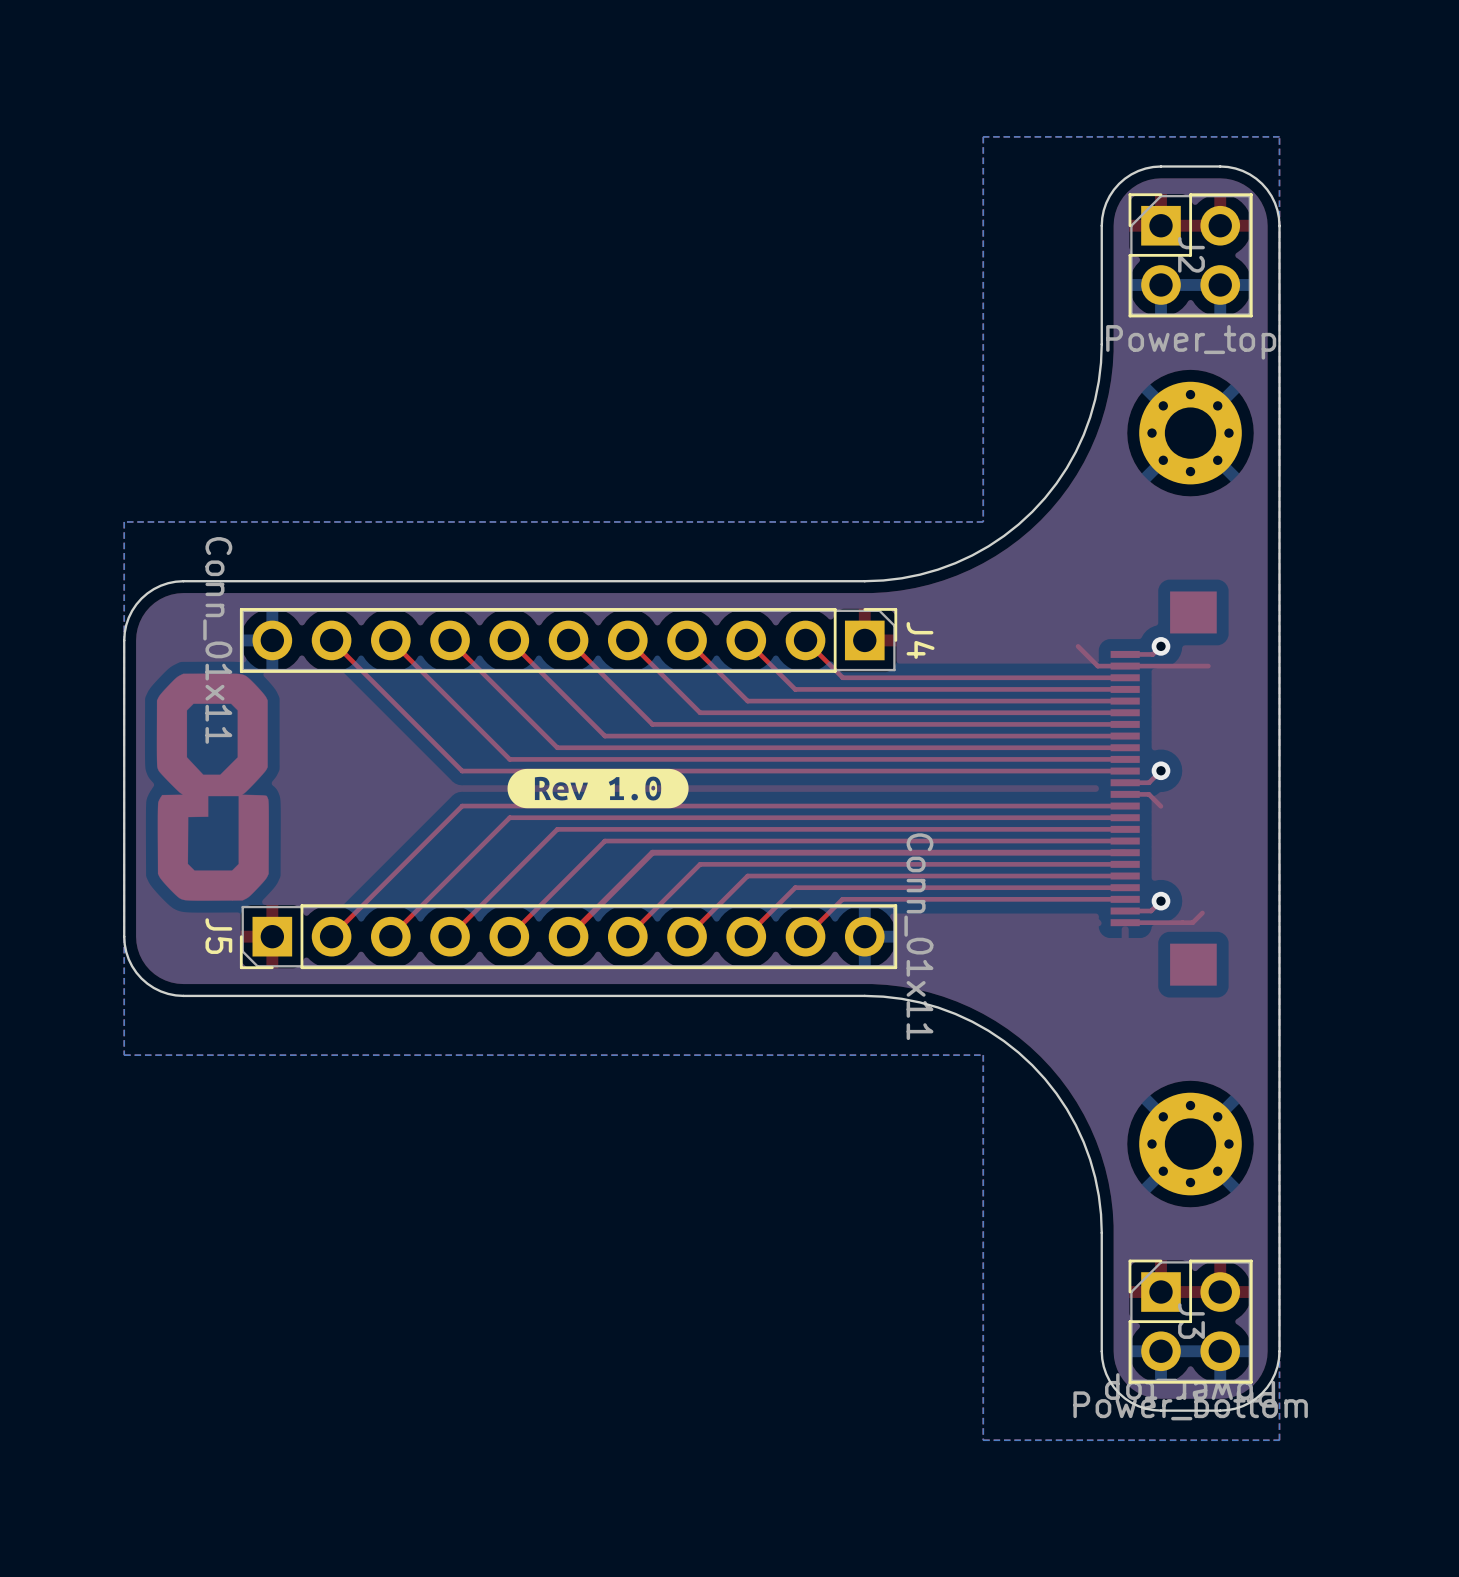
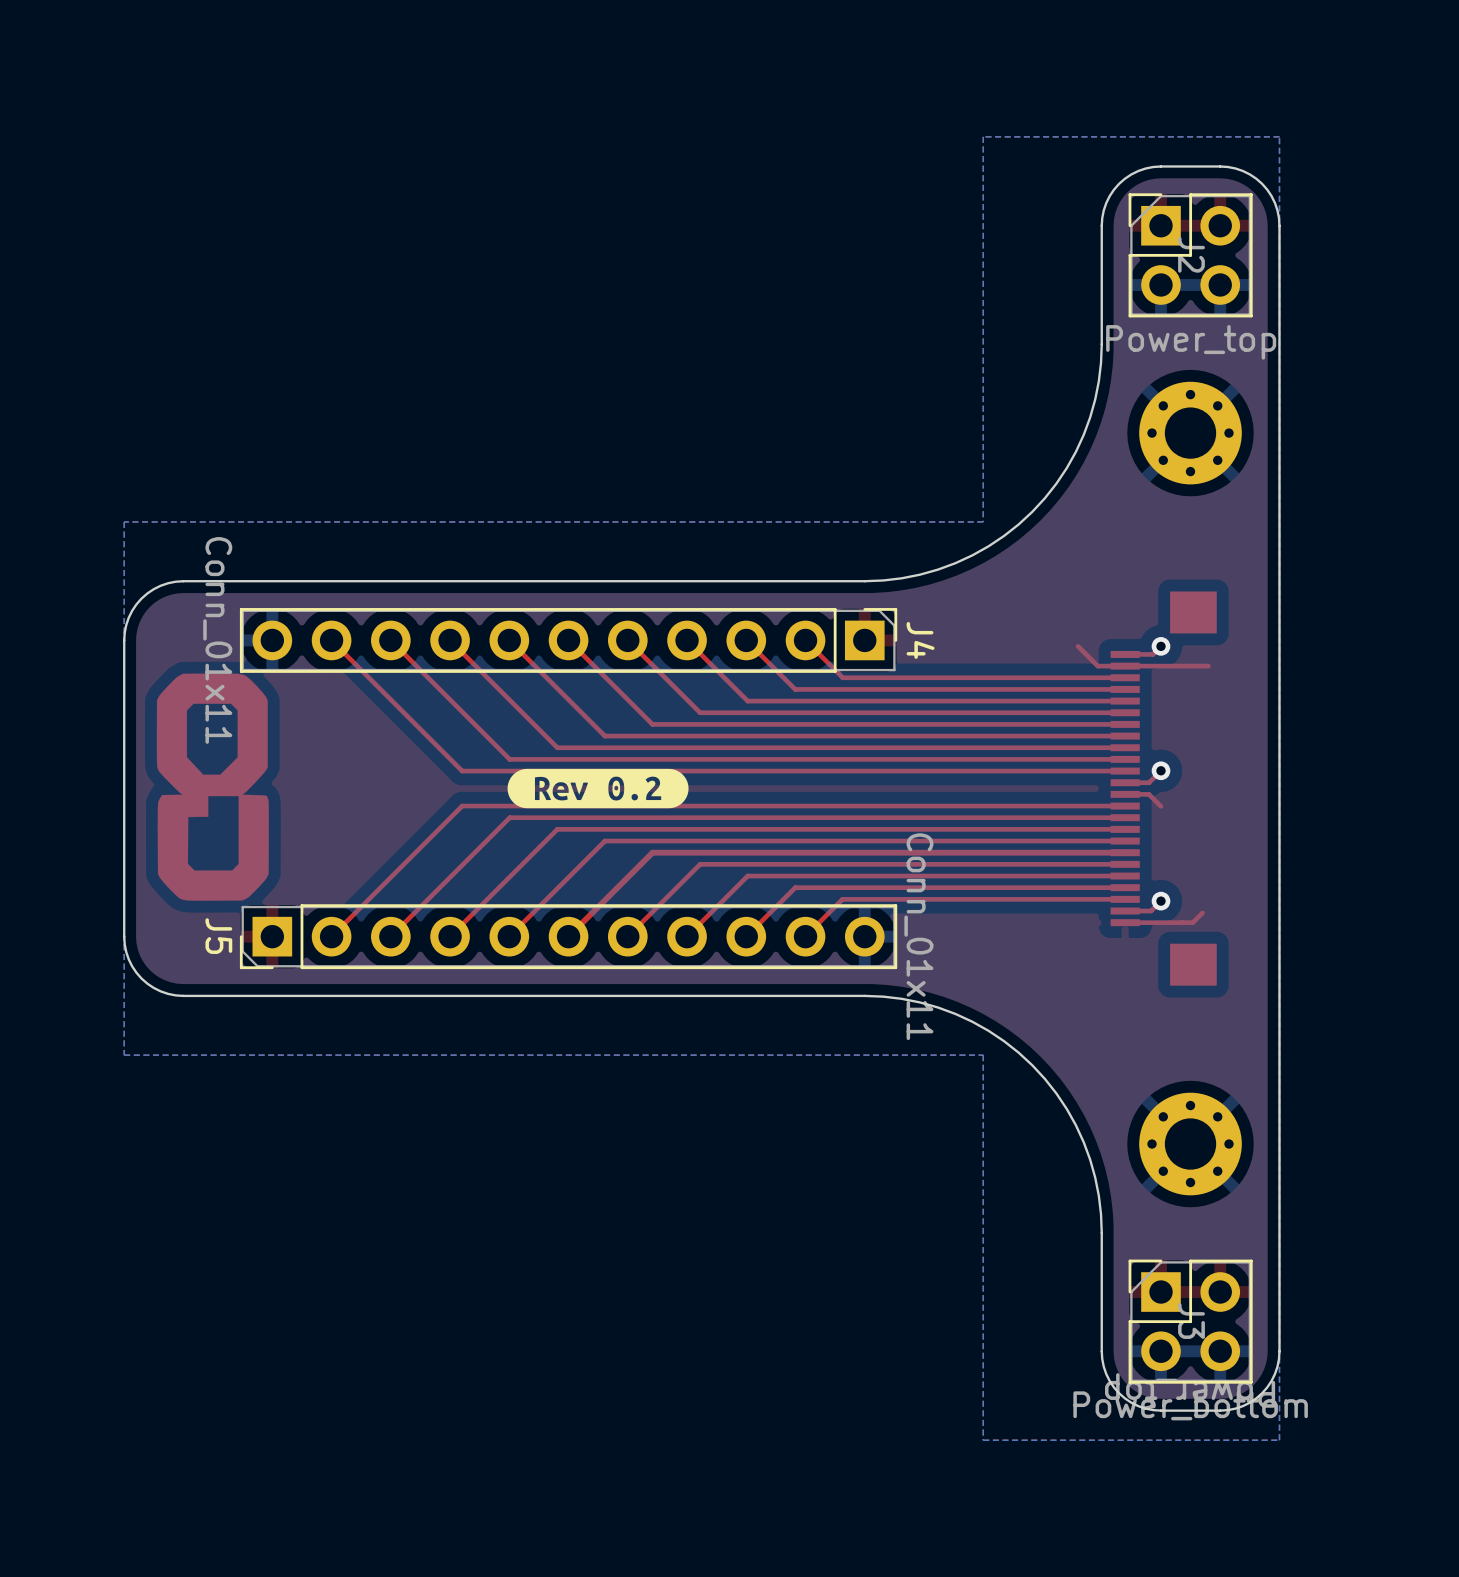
drawing shape: [507, 768, 689, 809] -> [507, 768, 689, 809]

